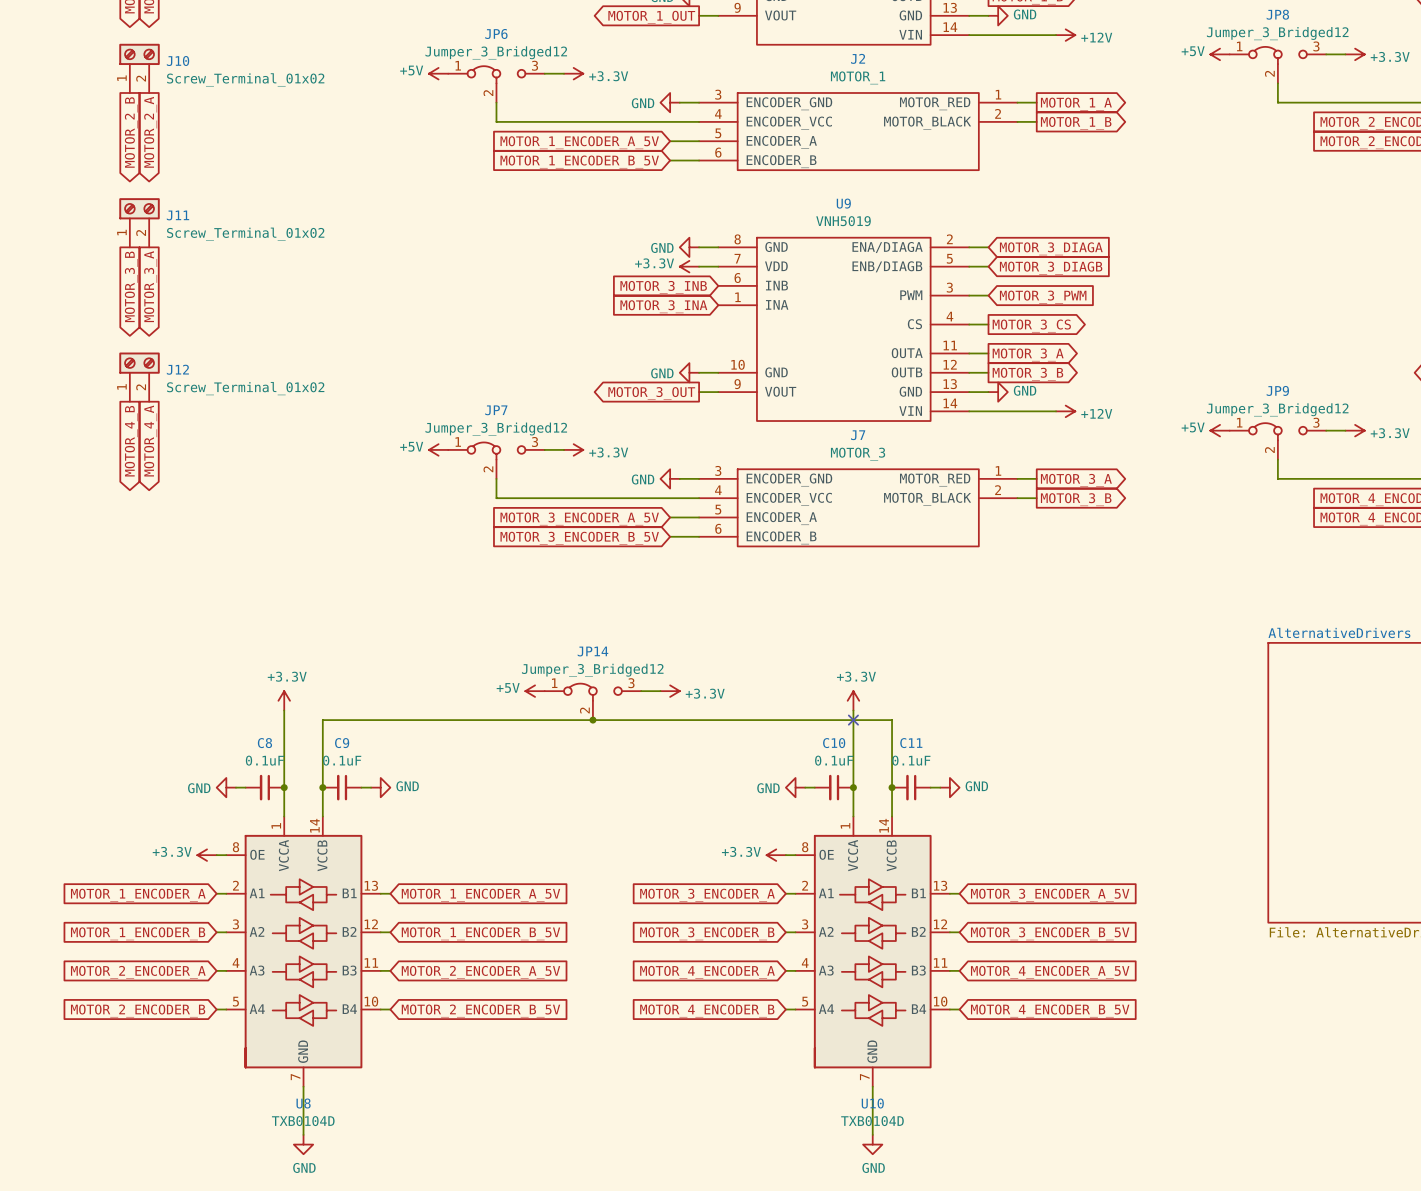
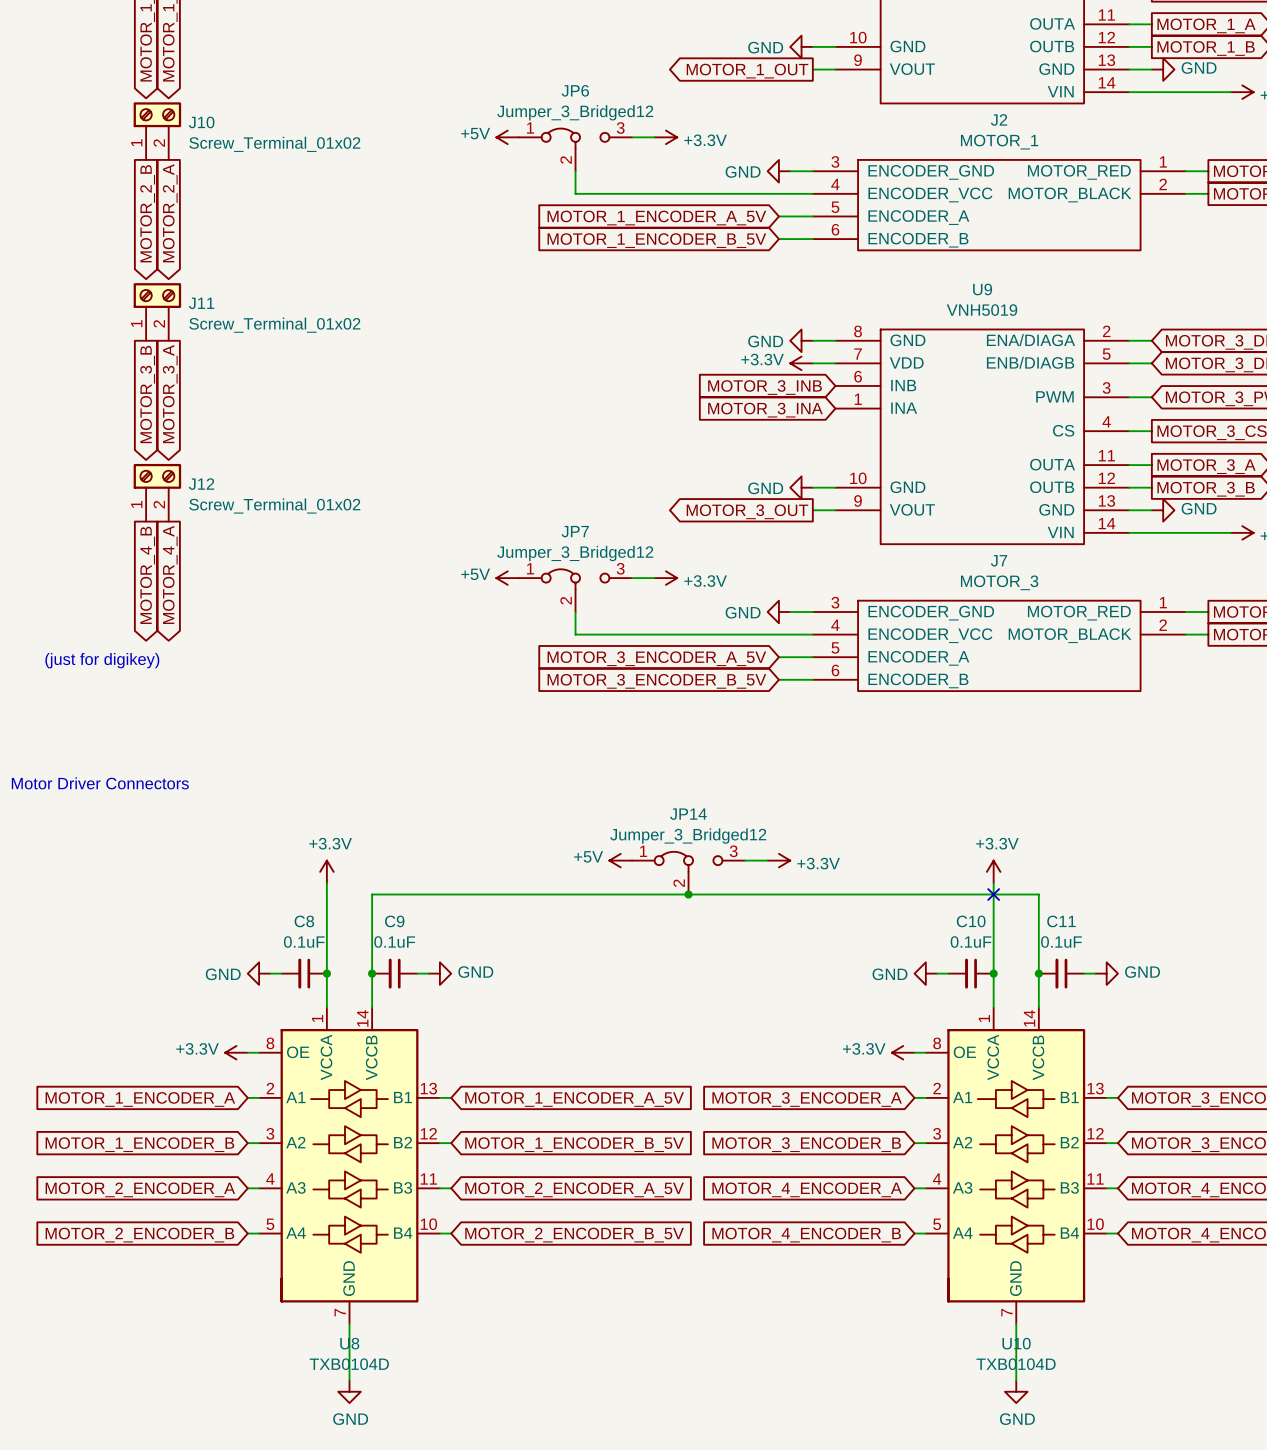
text: none -> (just for digikey) (102, 660)
text: none -> Motor Driver Connectors (100, 783)

